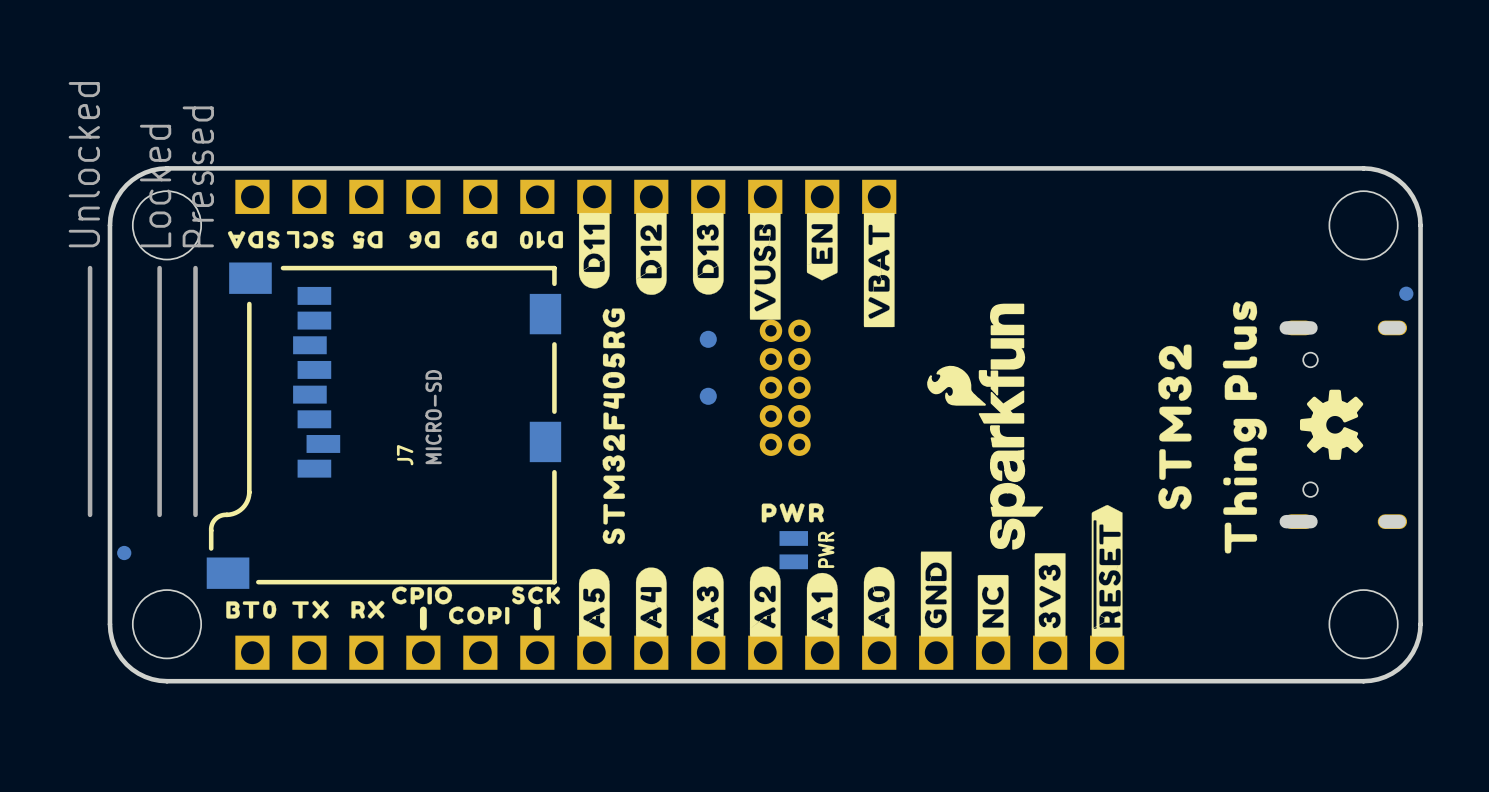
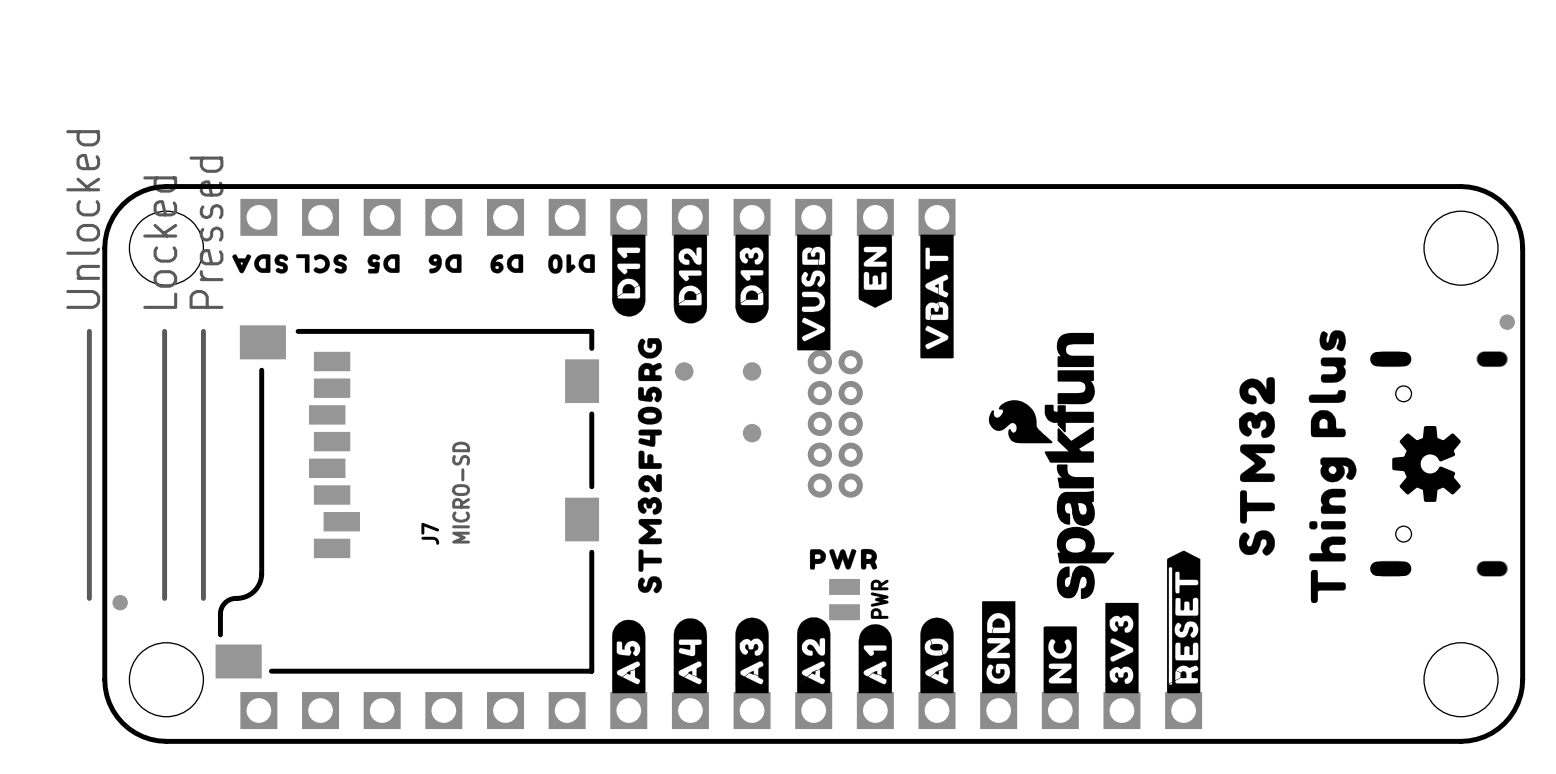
part: none -> (684, 371)
J7 position: (324, 425) -> (342, 501)
drawing: [226, 586, 561, 625] -> none
line: (423, 609) (423, 627) -> none
line: (537, 609) (537, 627) -> none

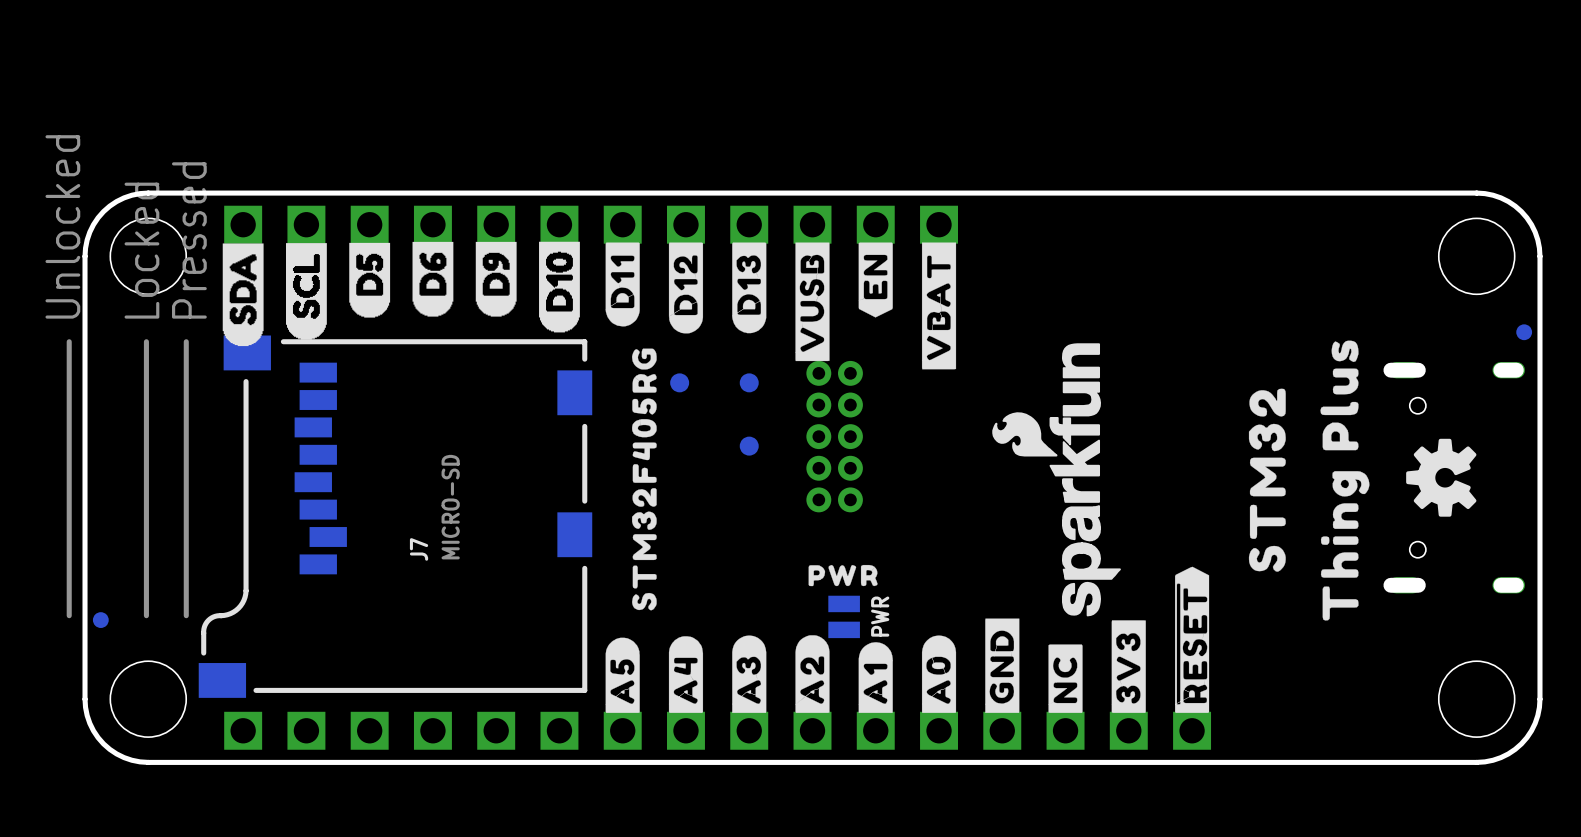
drawing shape: [232, 254, 289, 274] -> [222, 243, 264, 347]
drawing shape: [296, 254, 348, 274] -> [286, 243, 327, 340]
drawing shape: [367, 254, 400, 274] -> [349, 242, 391, 318]
drawing shape: [428, 254, 462, 274] -> [412, 241, 454, 317]
drawing shape: [490, 254, 524, 274] -> [475, 241, 517, 317]
drawing shape: [548, 254, 595, 274] -> [539, 241, 580, 333]

